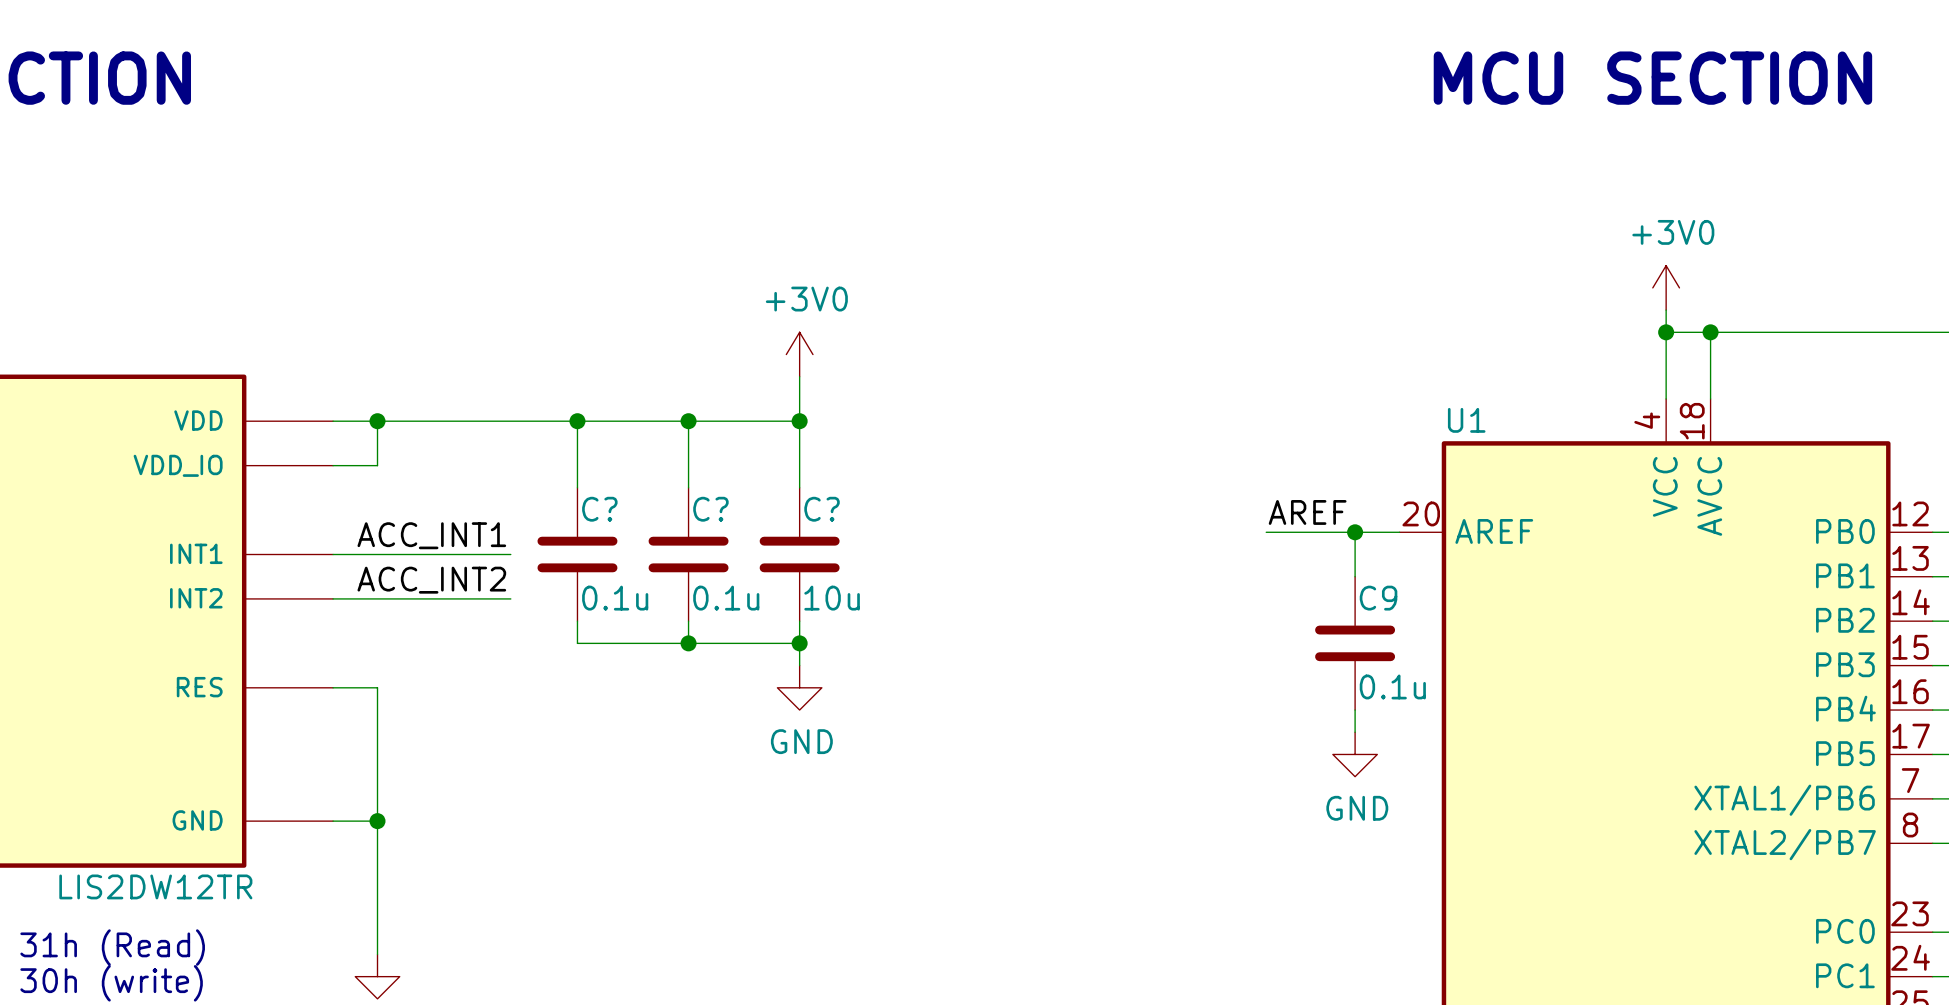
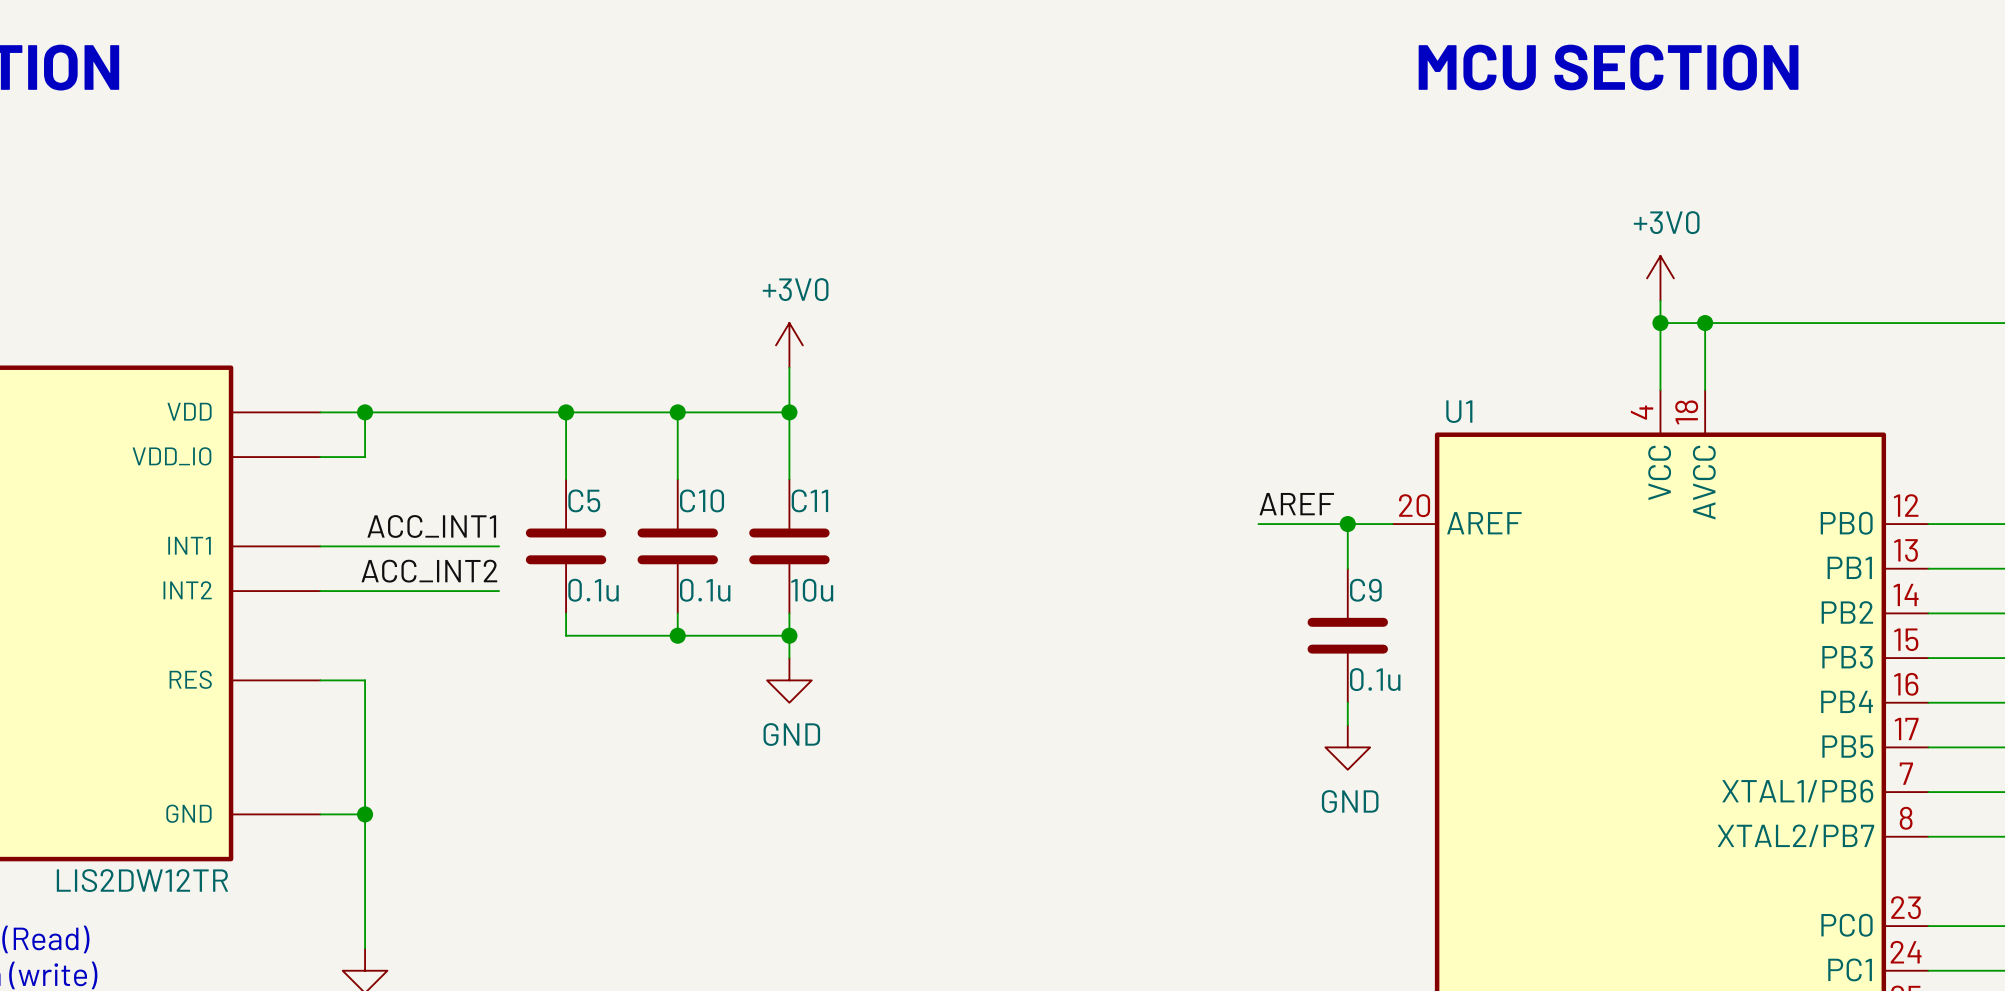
C? name: C? (599, 509) -> C5 (584, 500)
C? name: C? (710, 509) -> C10 (702, 500)
C? name: C? (822, 509) -> C11 (809, 500)

